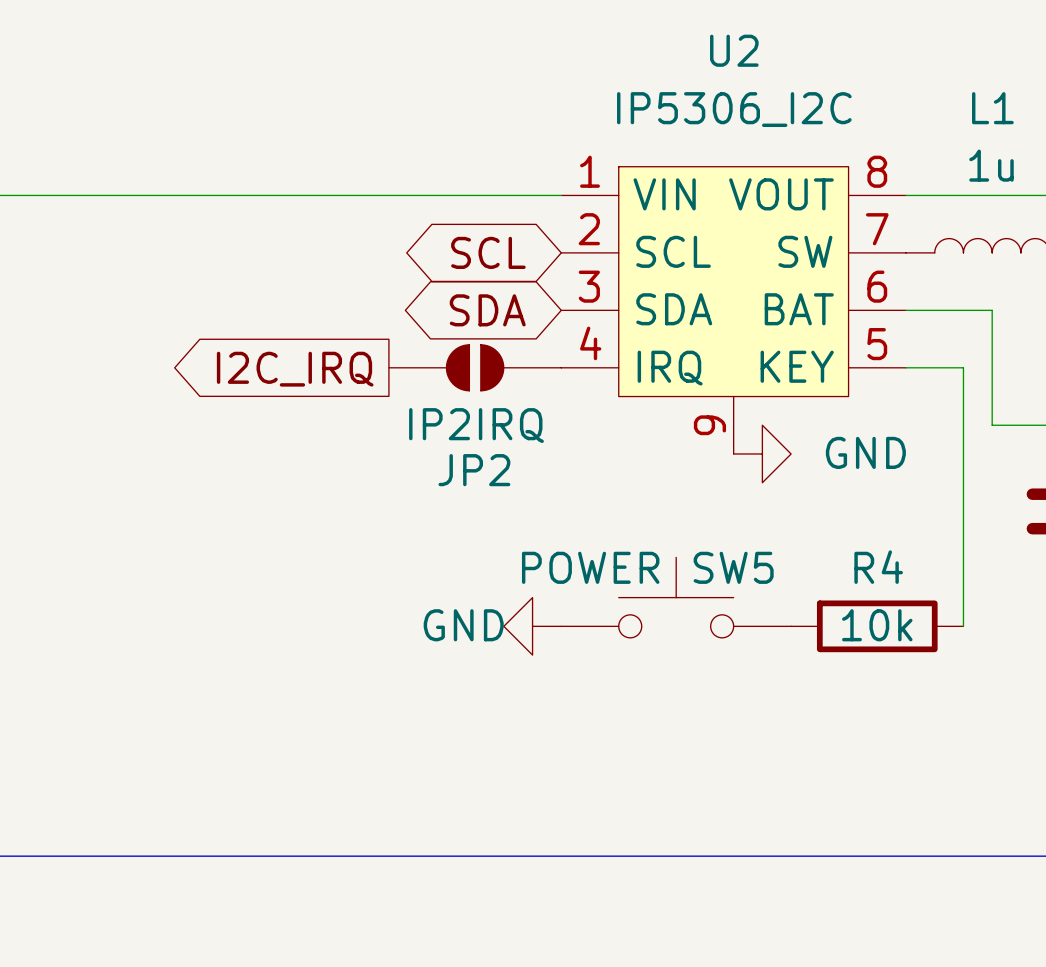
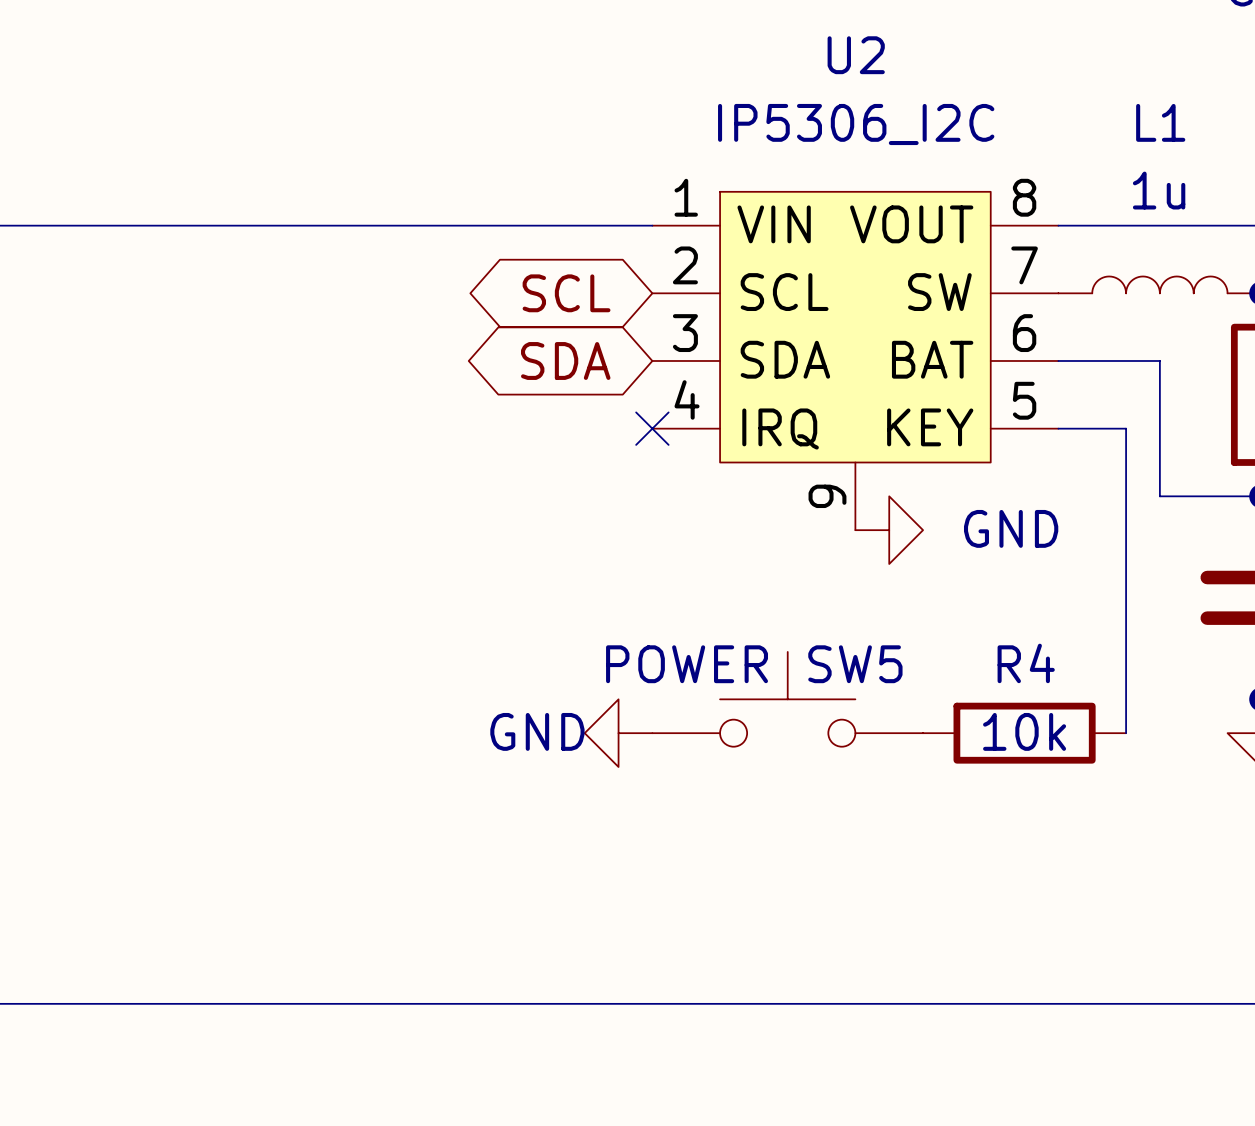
JP2: IP2IRQ (475, 367) -> none
no-connect mark: none -> (652, 428)
global label: I2C_IRQ (295, 369) -> none

